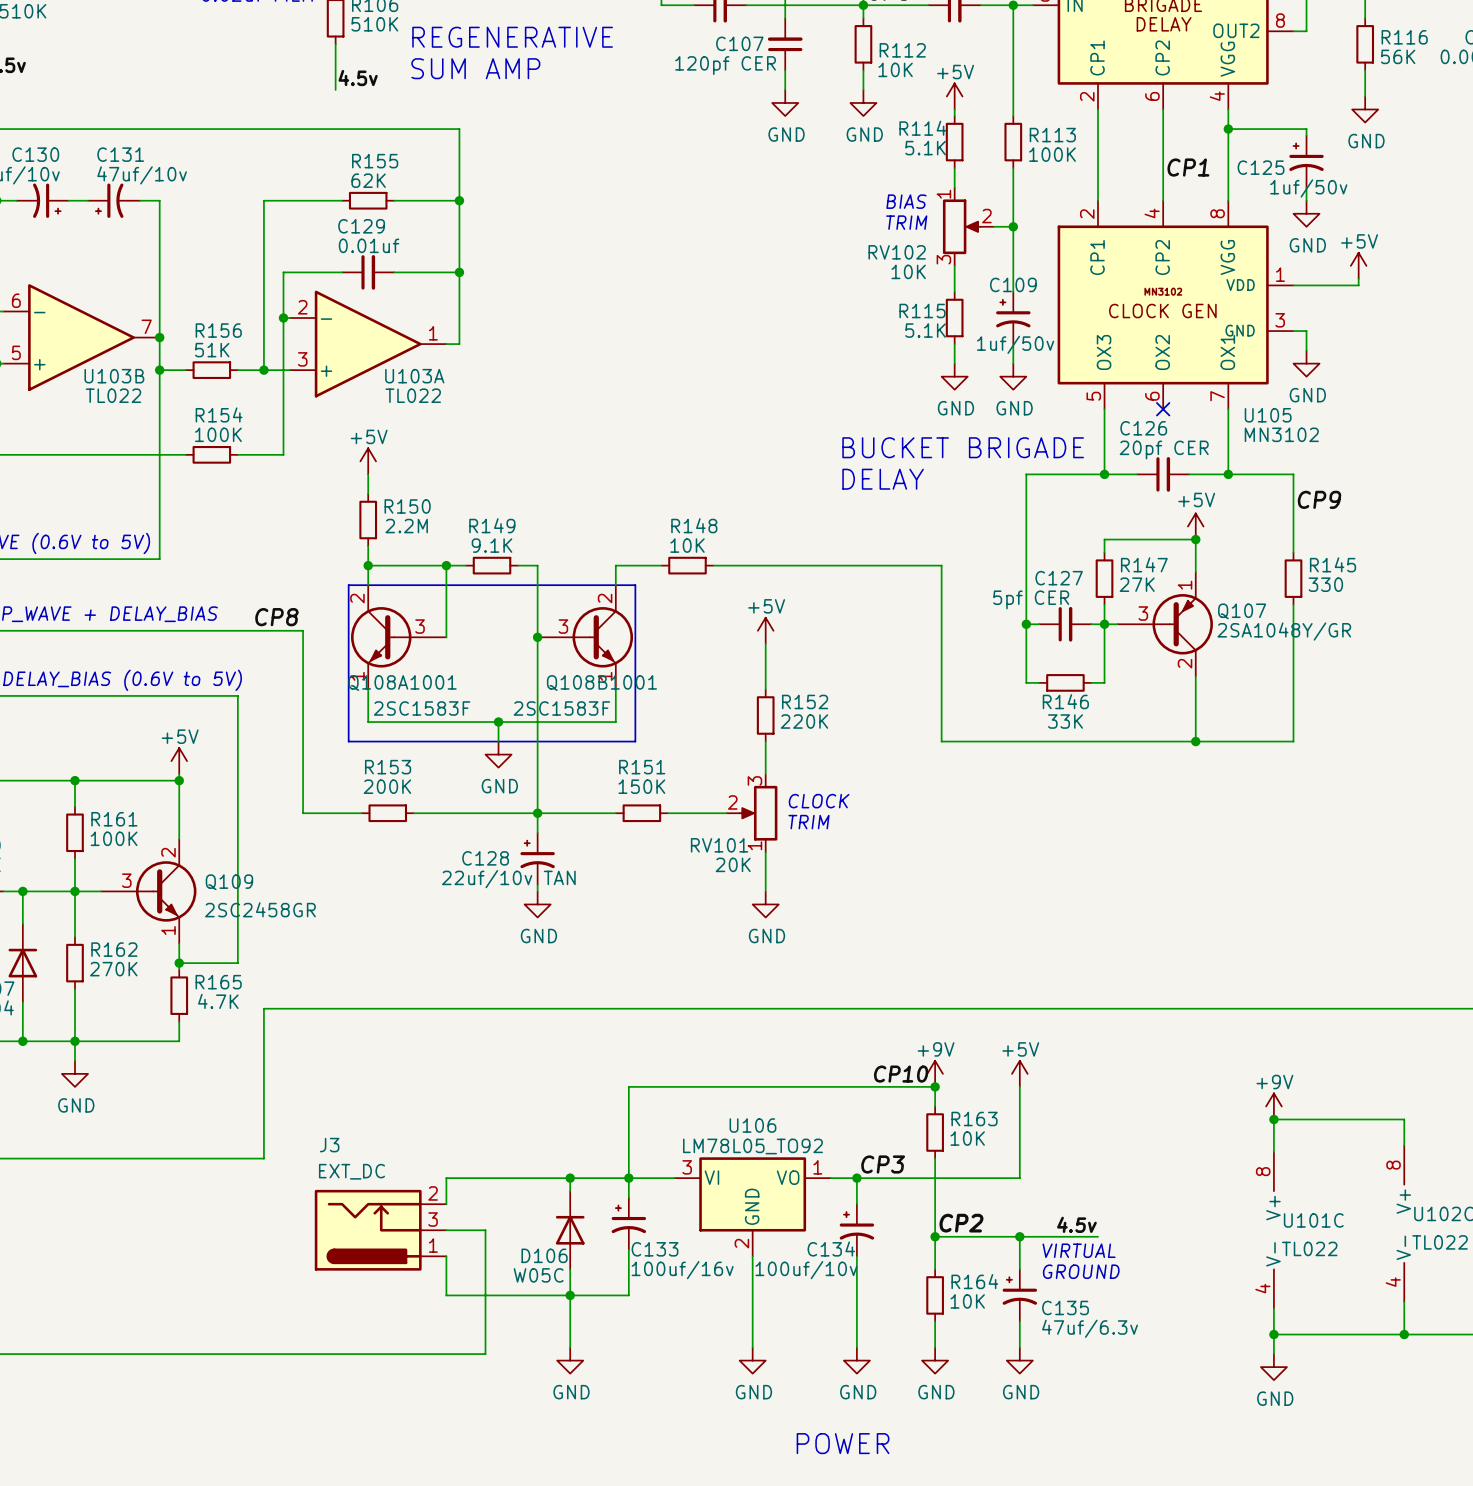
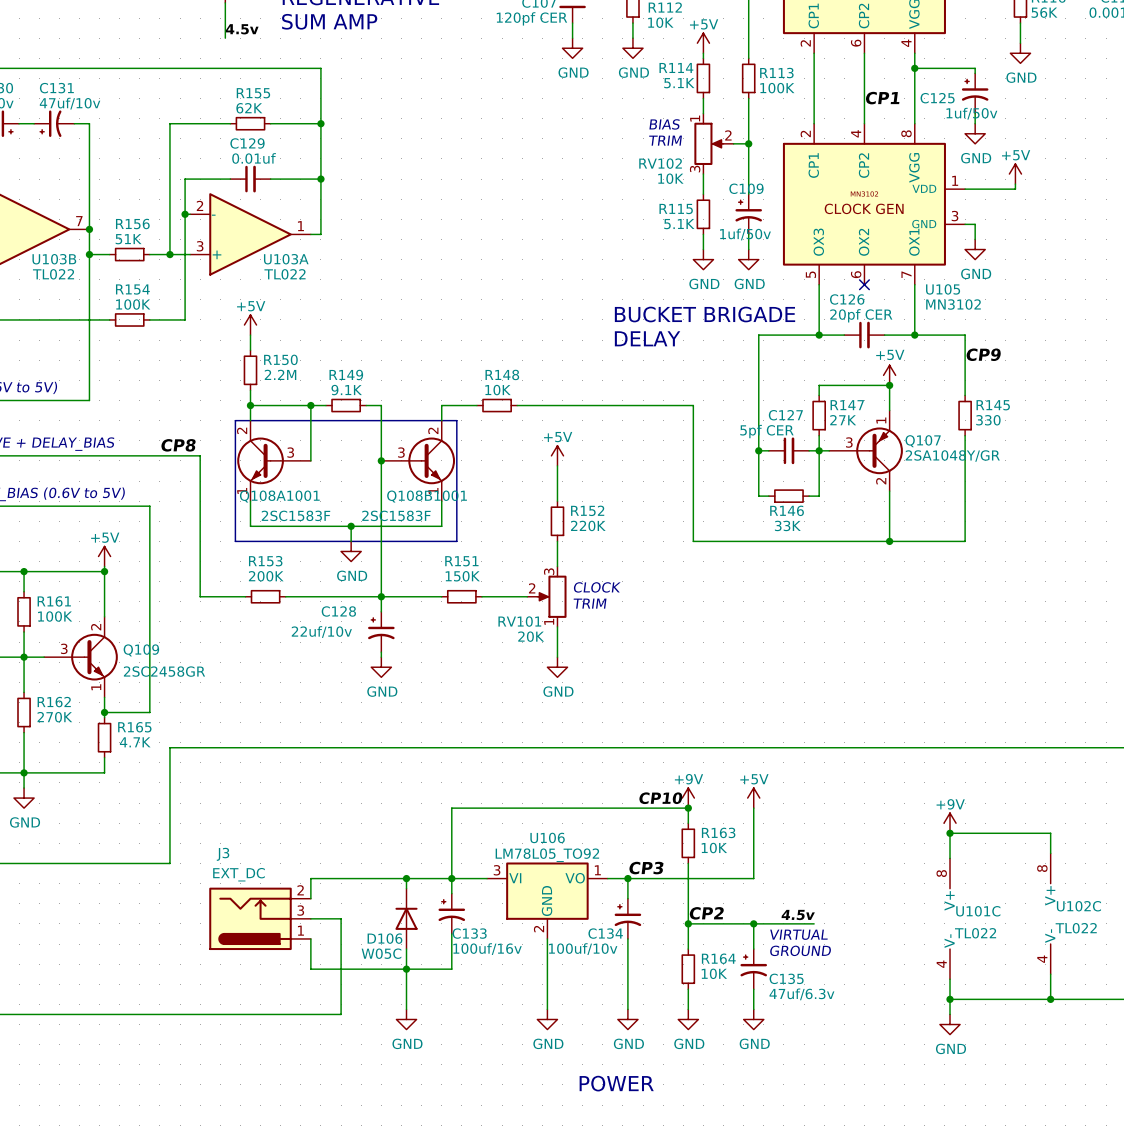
C128 name position: C128 (485, 858) -> C128 (338, 611)
C128 value: 22uf/10v TAN (508, 879) -> 22uf/10v (321, 632)

